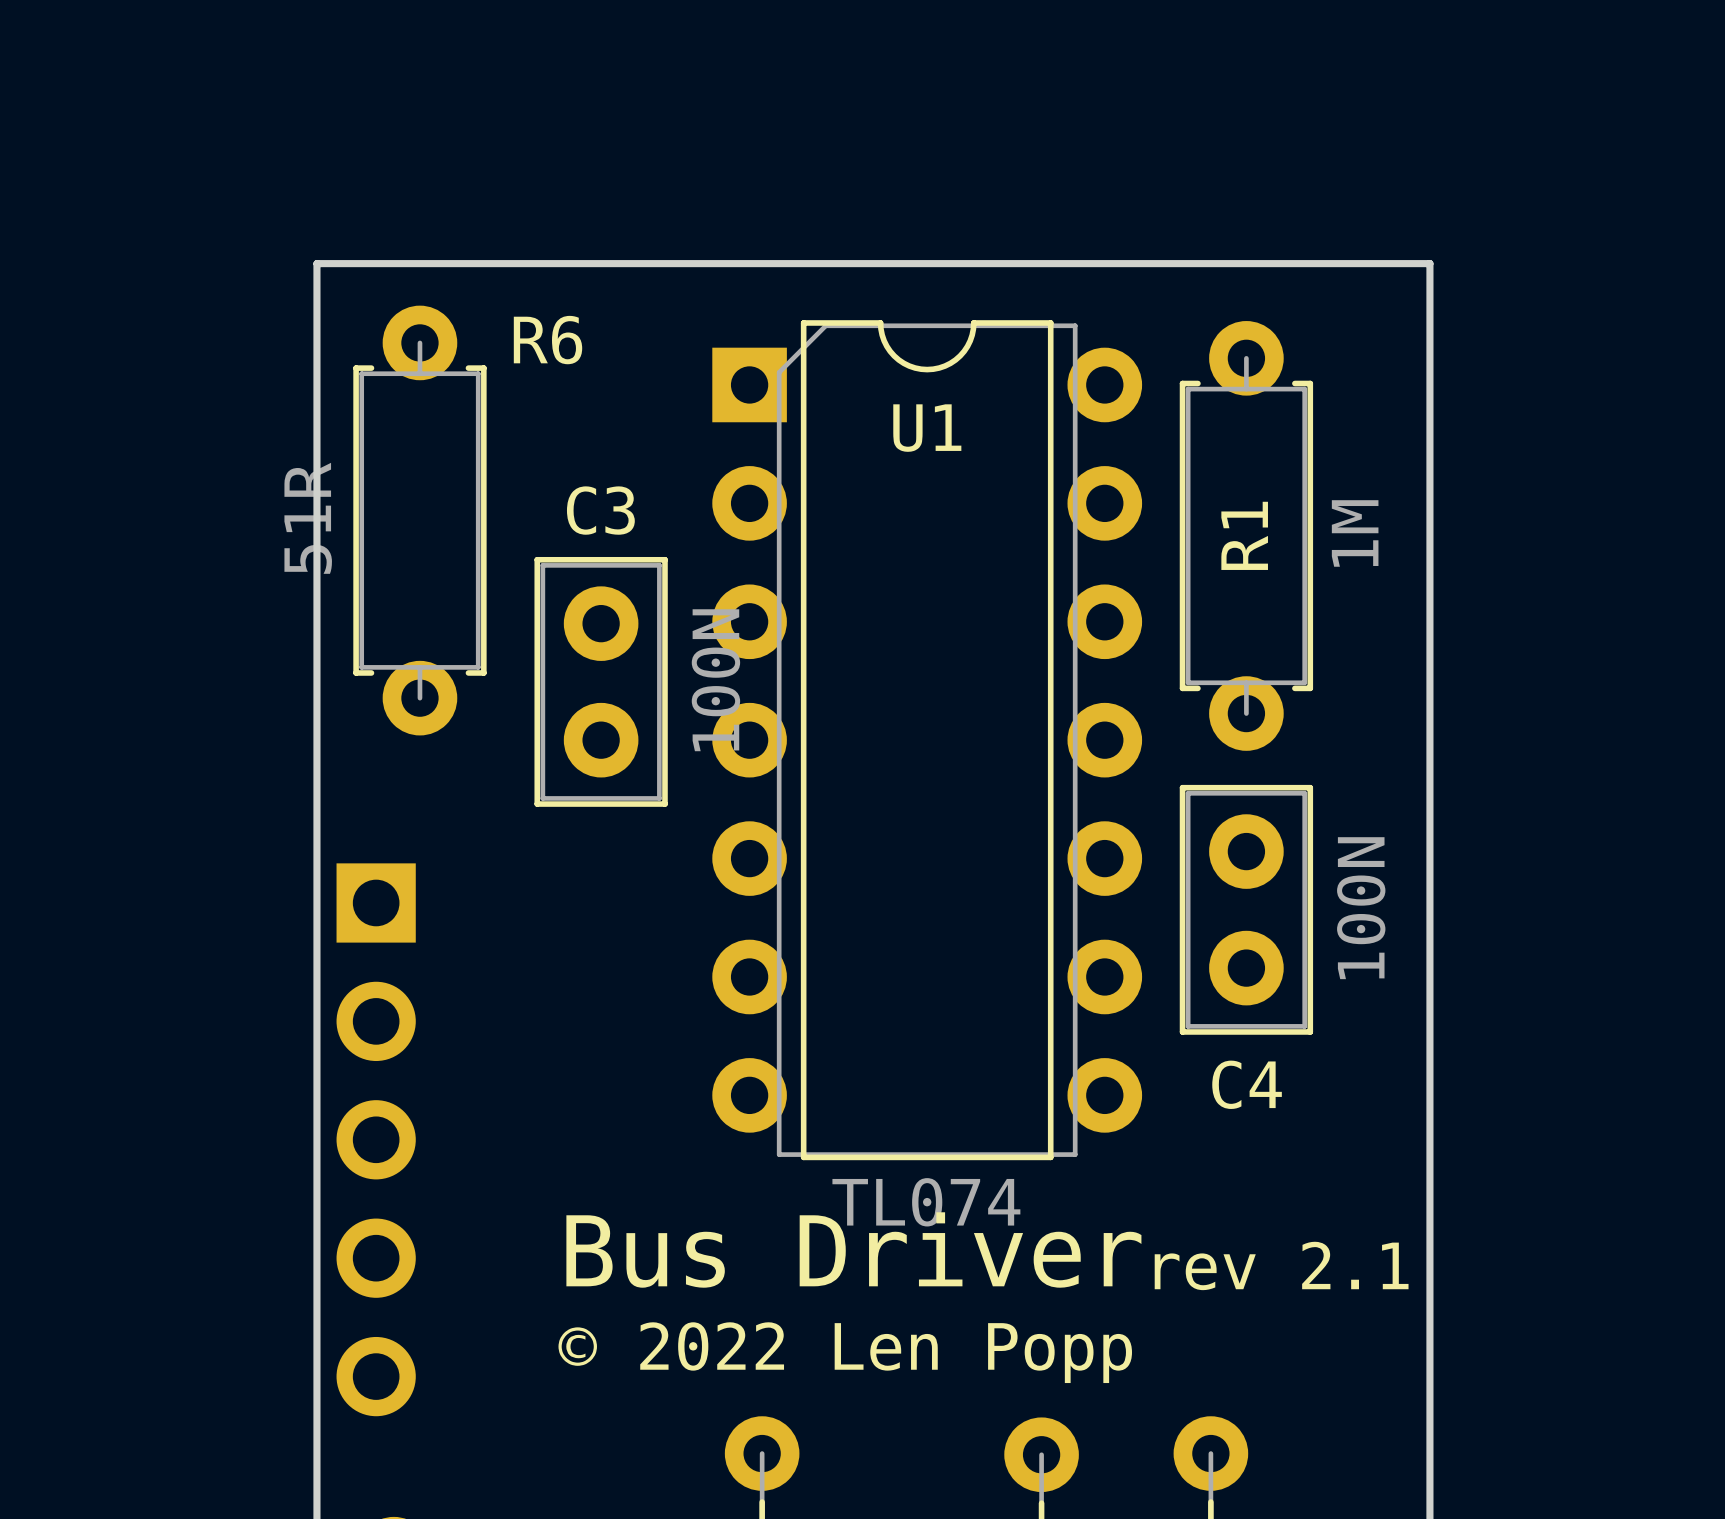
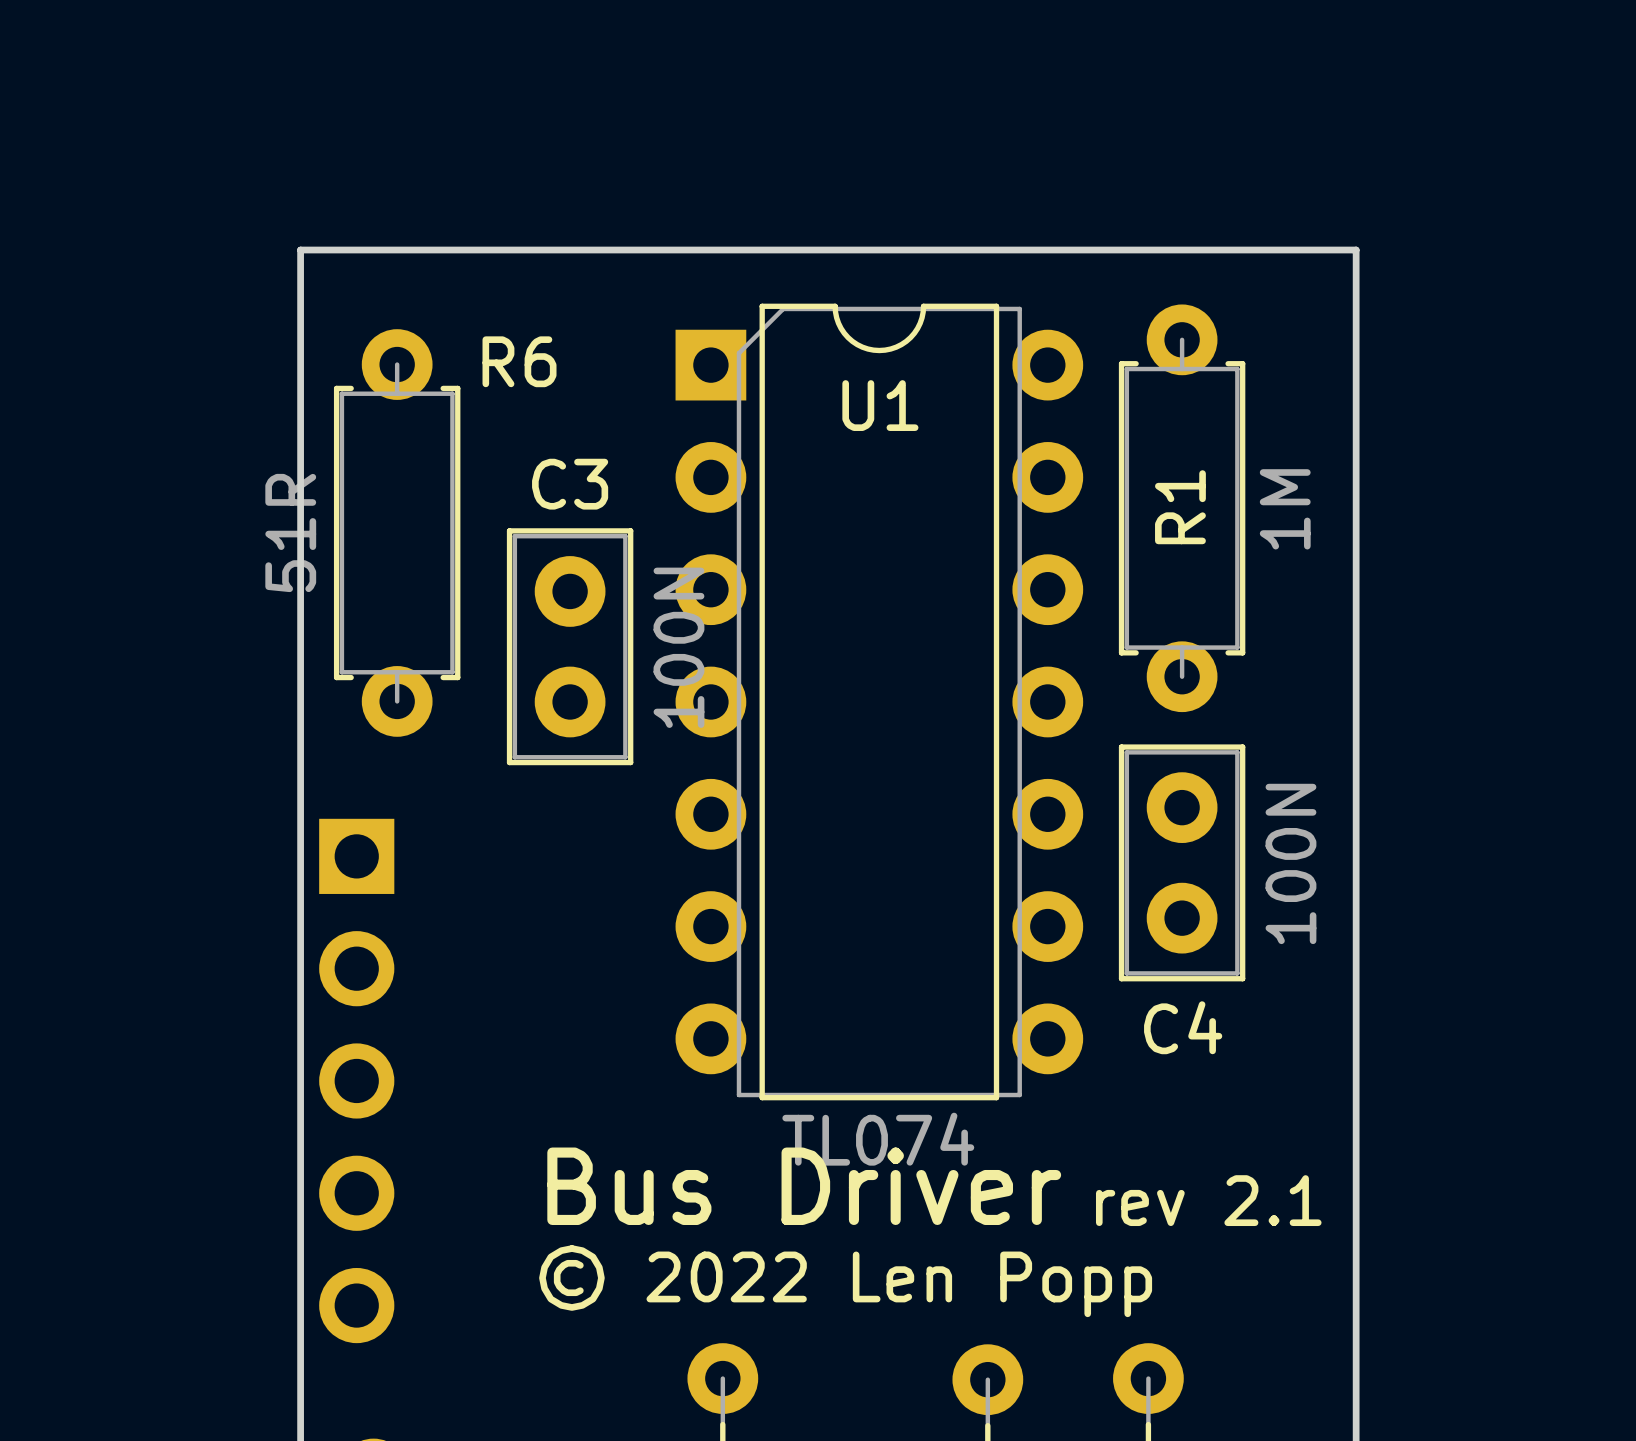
R6 position: (419, 520) -> (397, 532)

